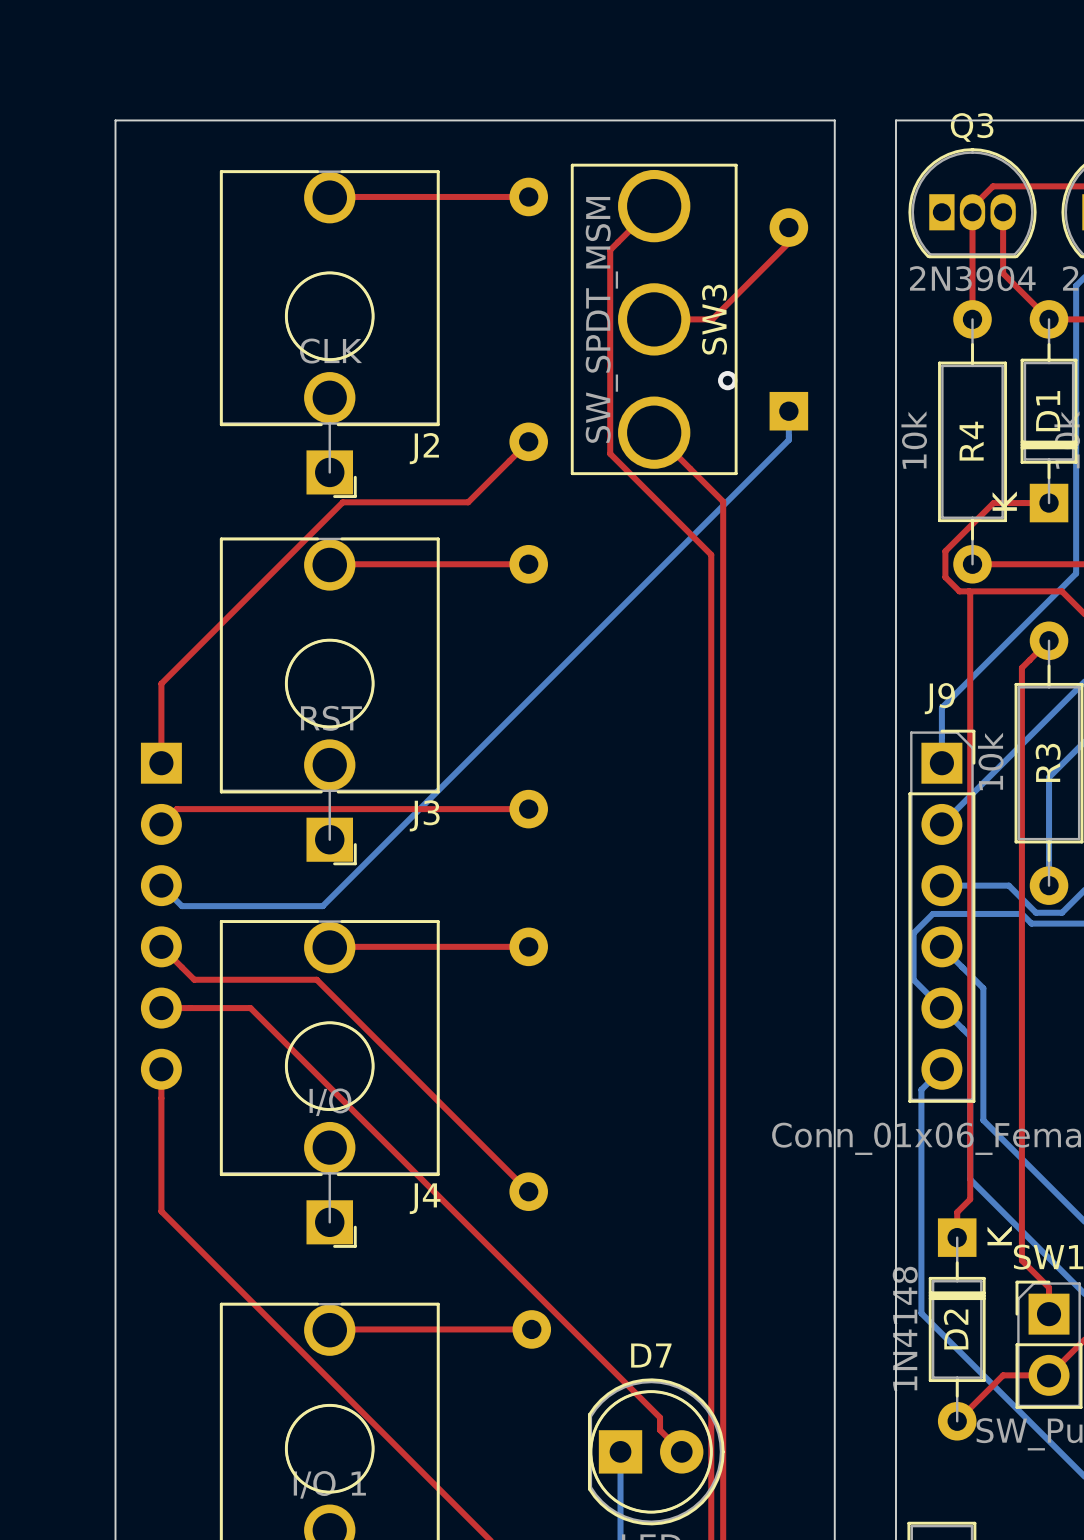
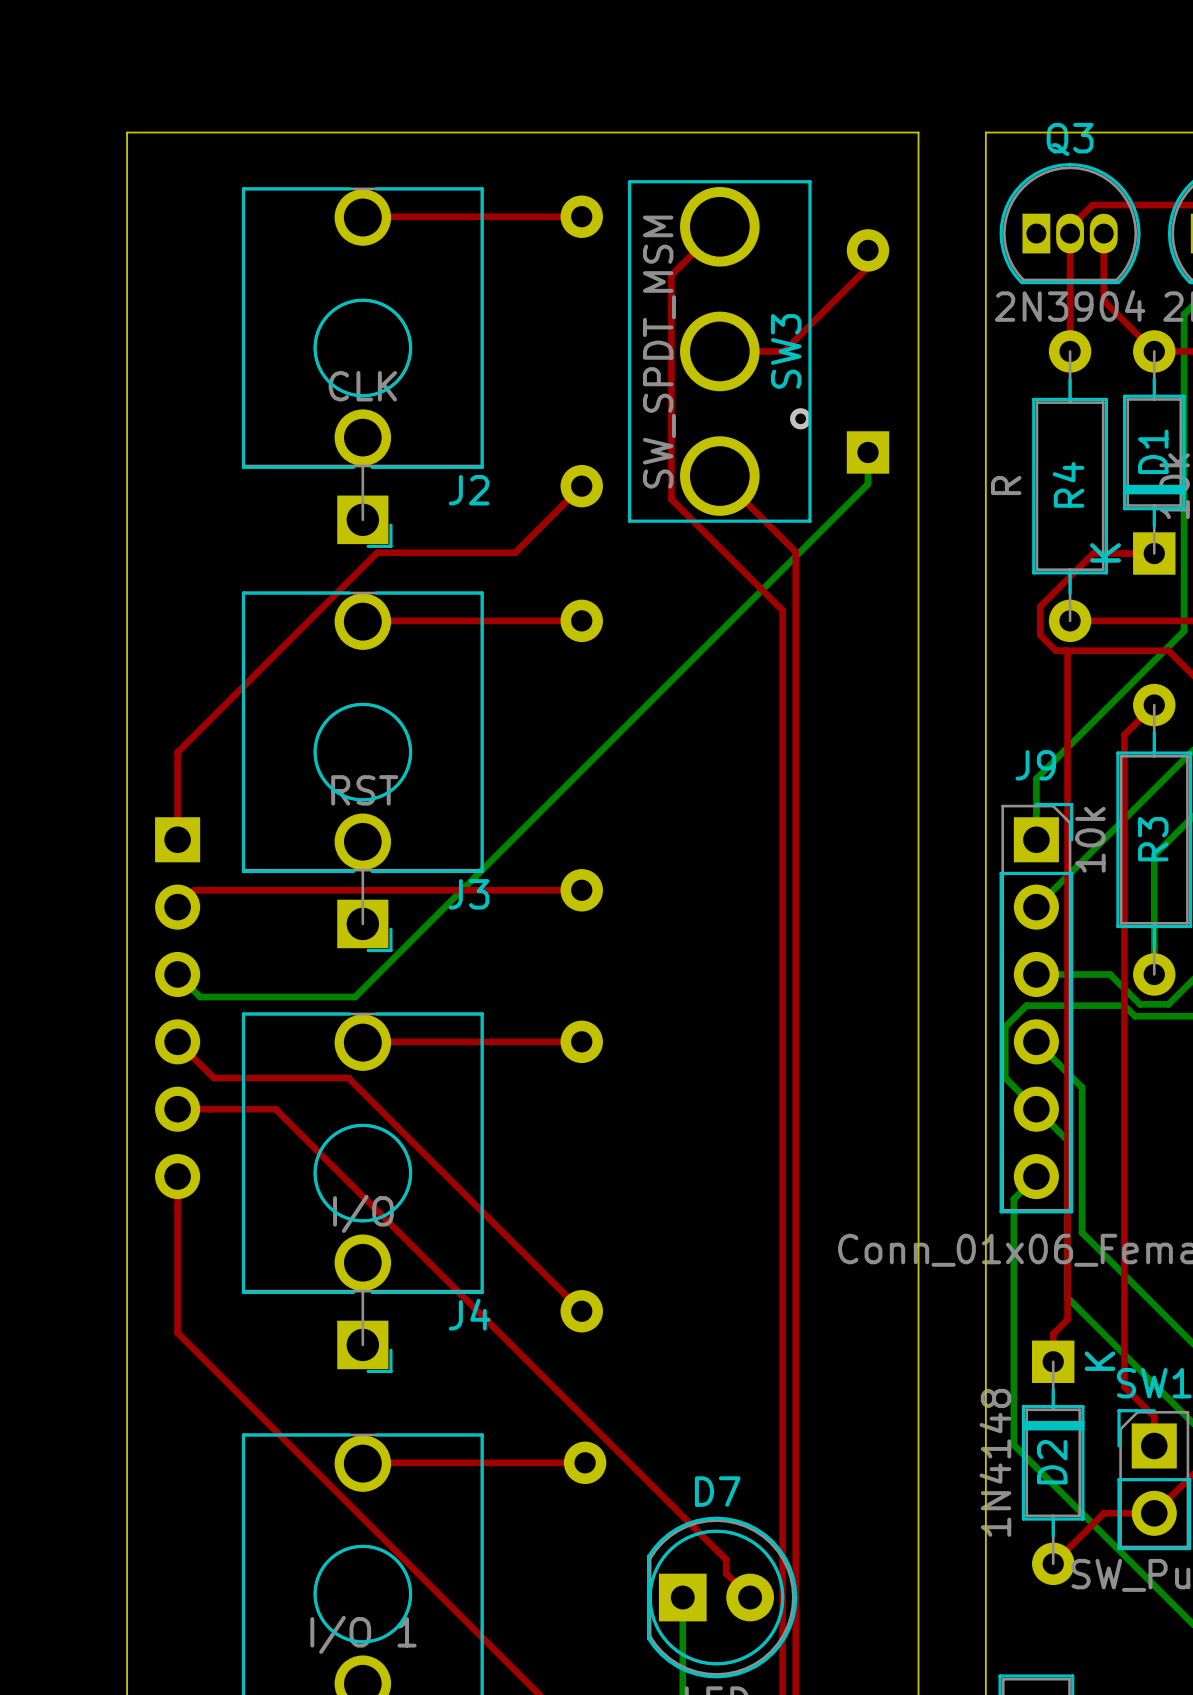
R4 value: 10k (914, 440) -> R (1006, 485)

